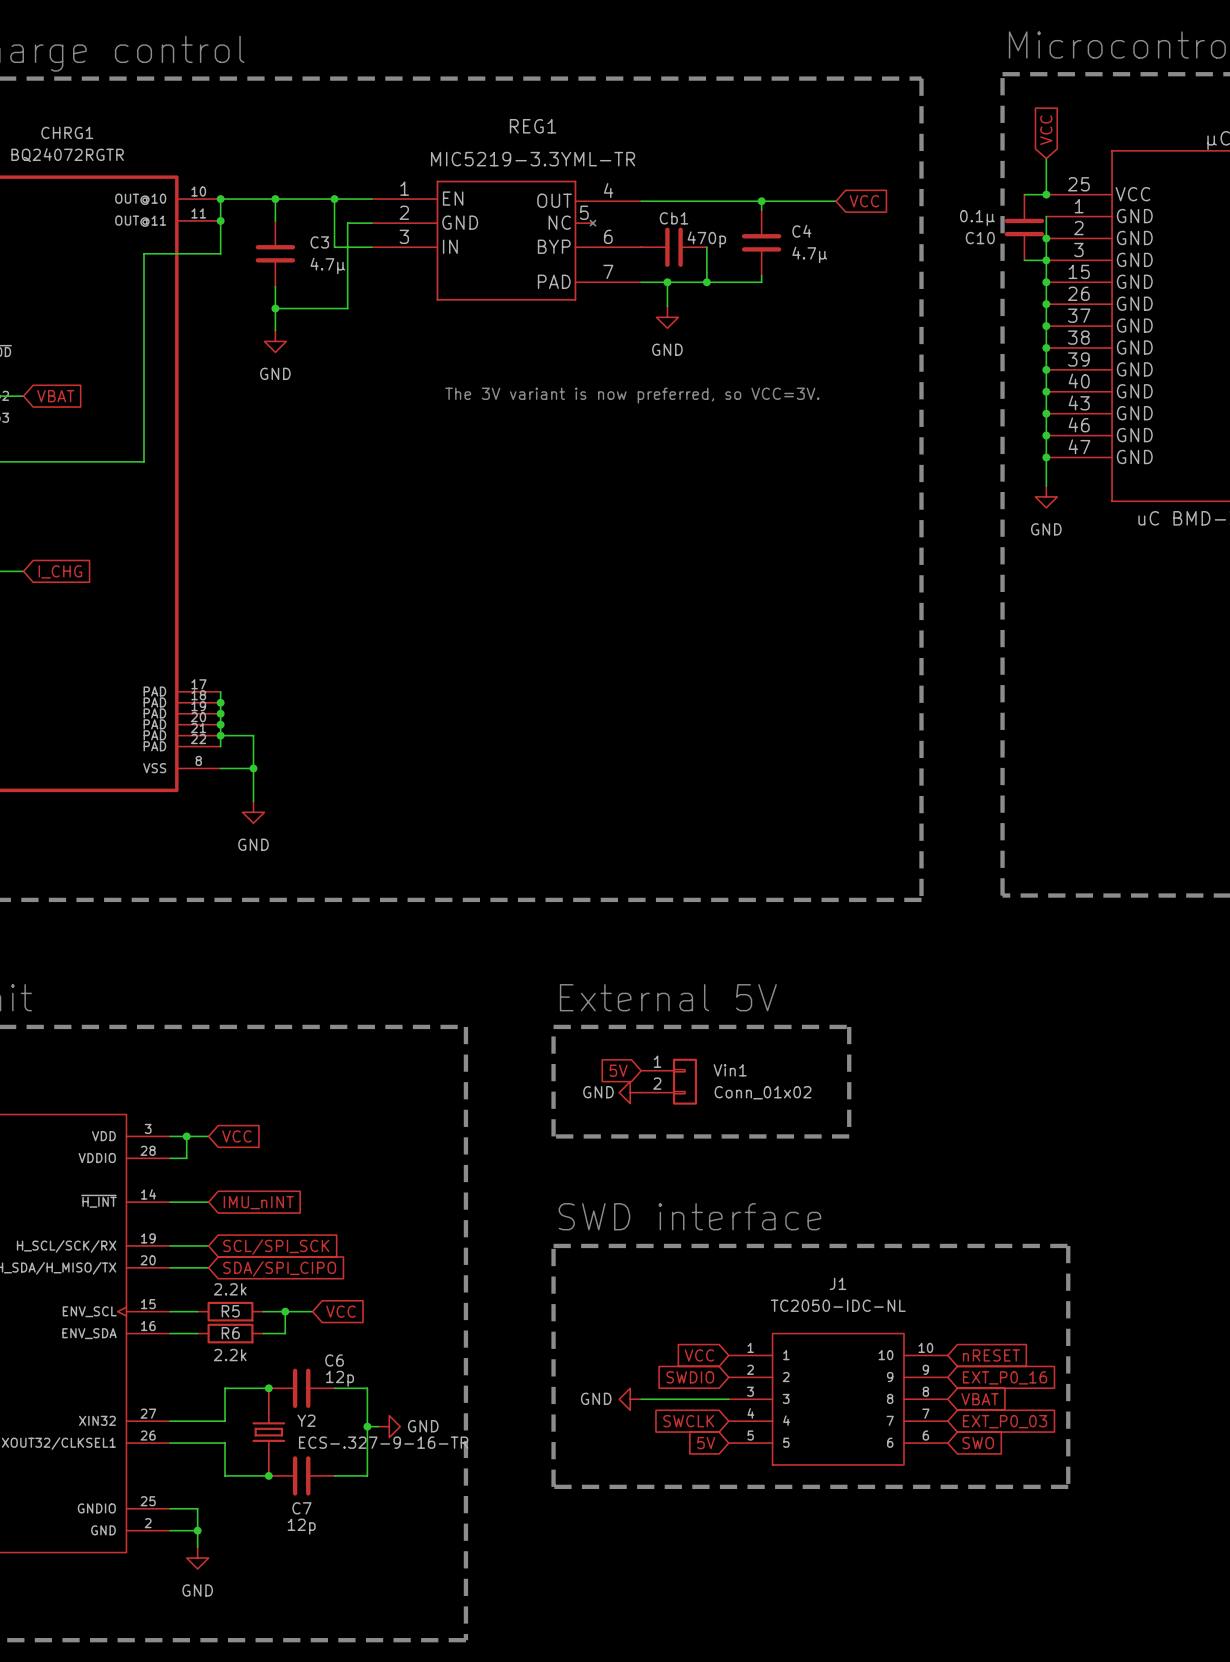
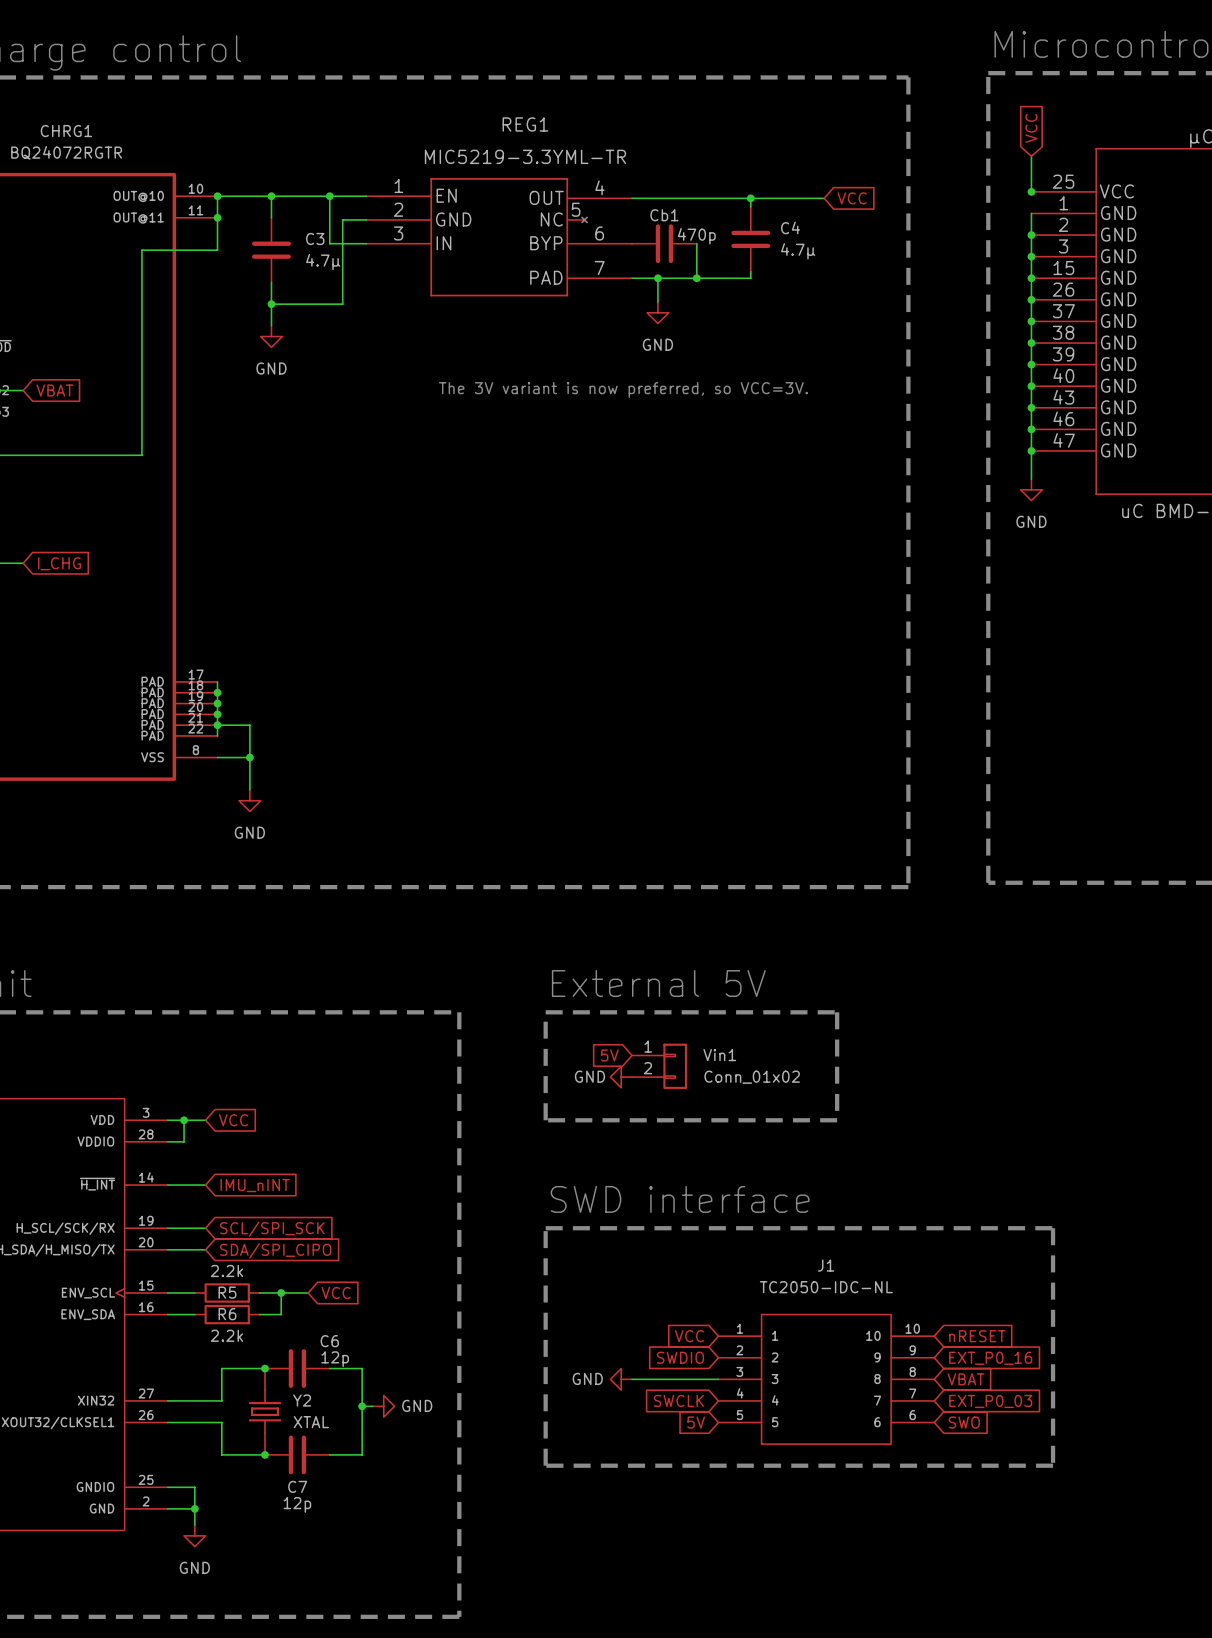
wire: (1024, 194) (1046, 194) -> none
C10: 0.1µ (1024, 227) -> none
wire: (1024, 260) (1046, 260) -> none
Y2 value: ECS-.327-9-16-TR (383, 1442) -> XTAL (311, 1422)

